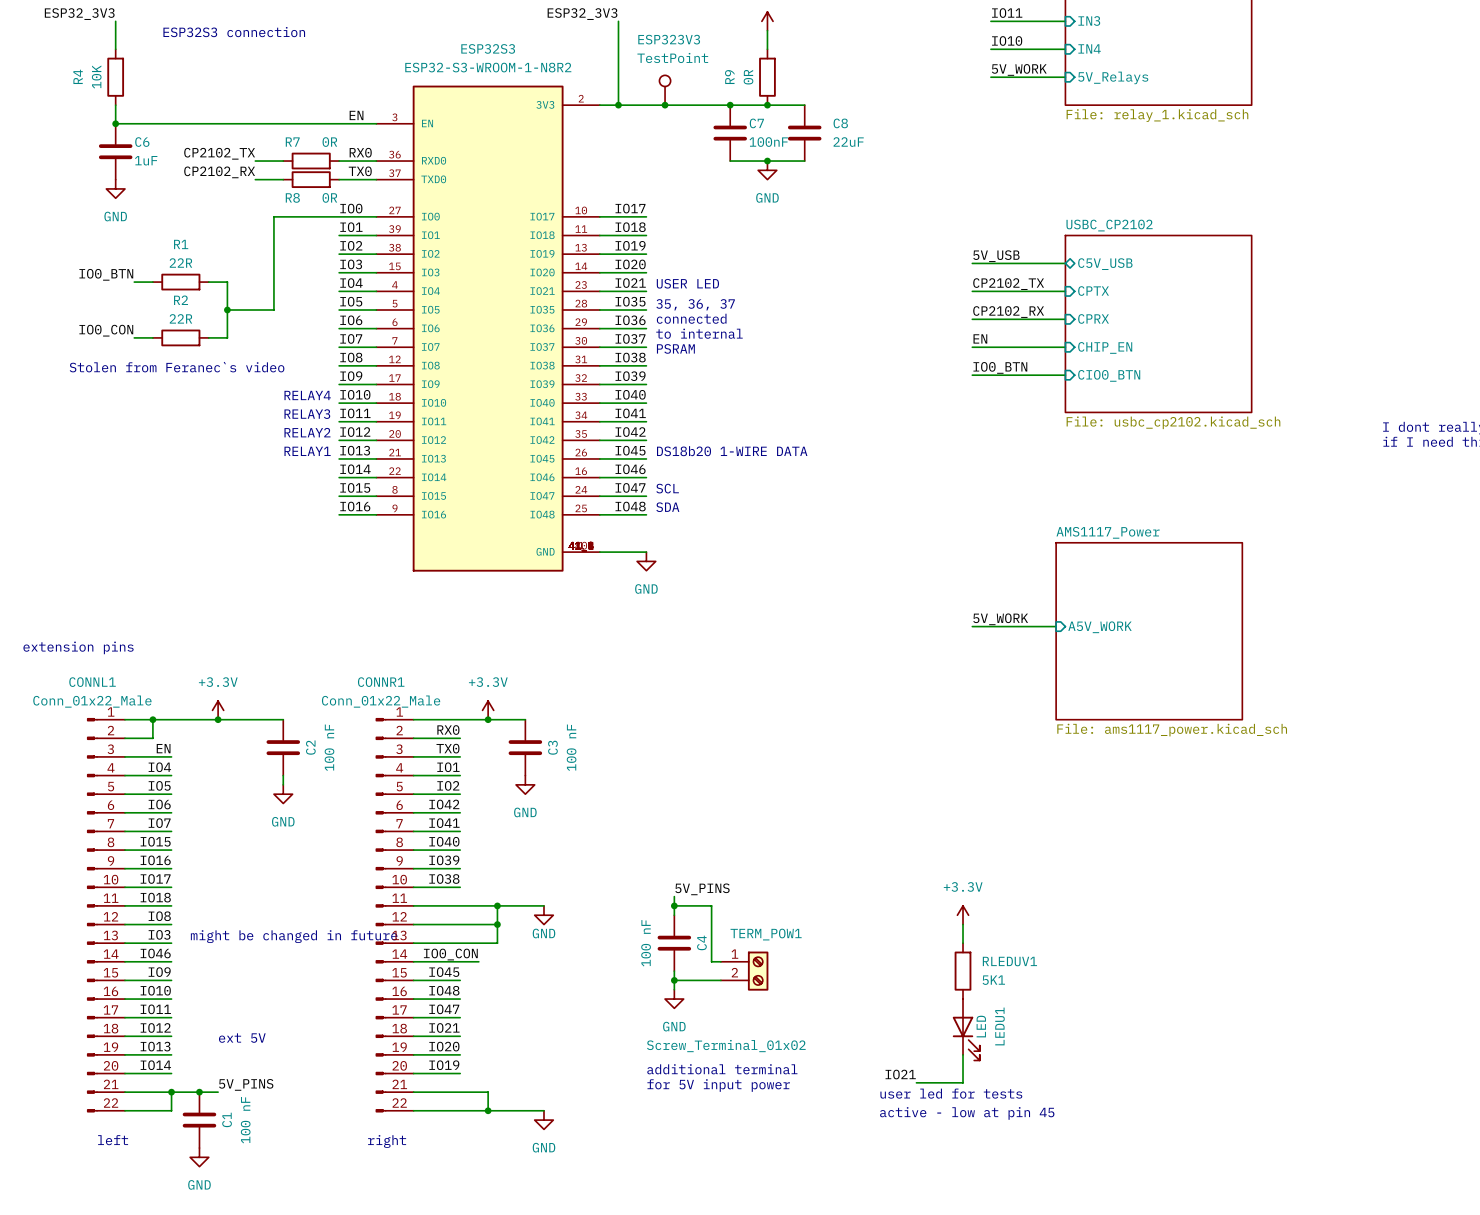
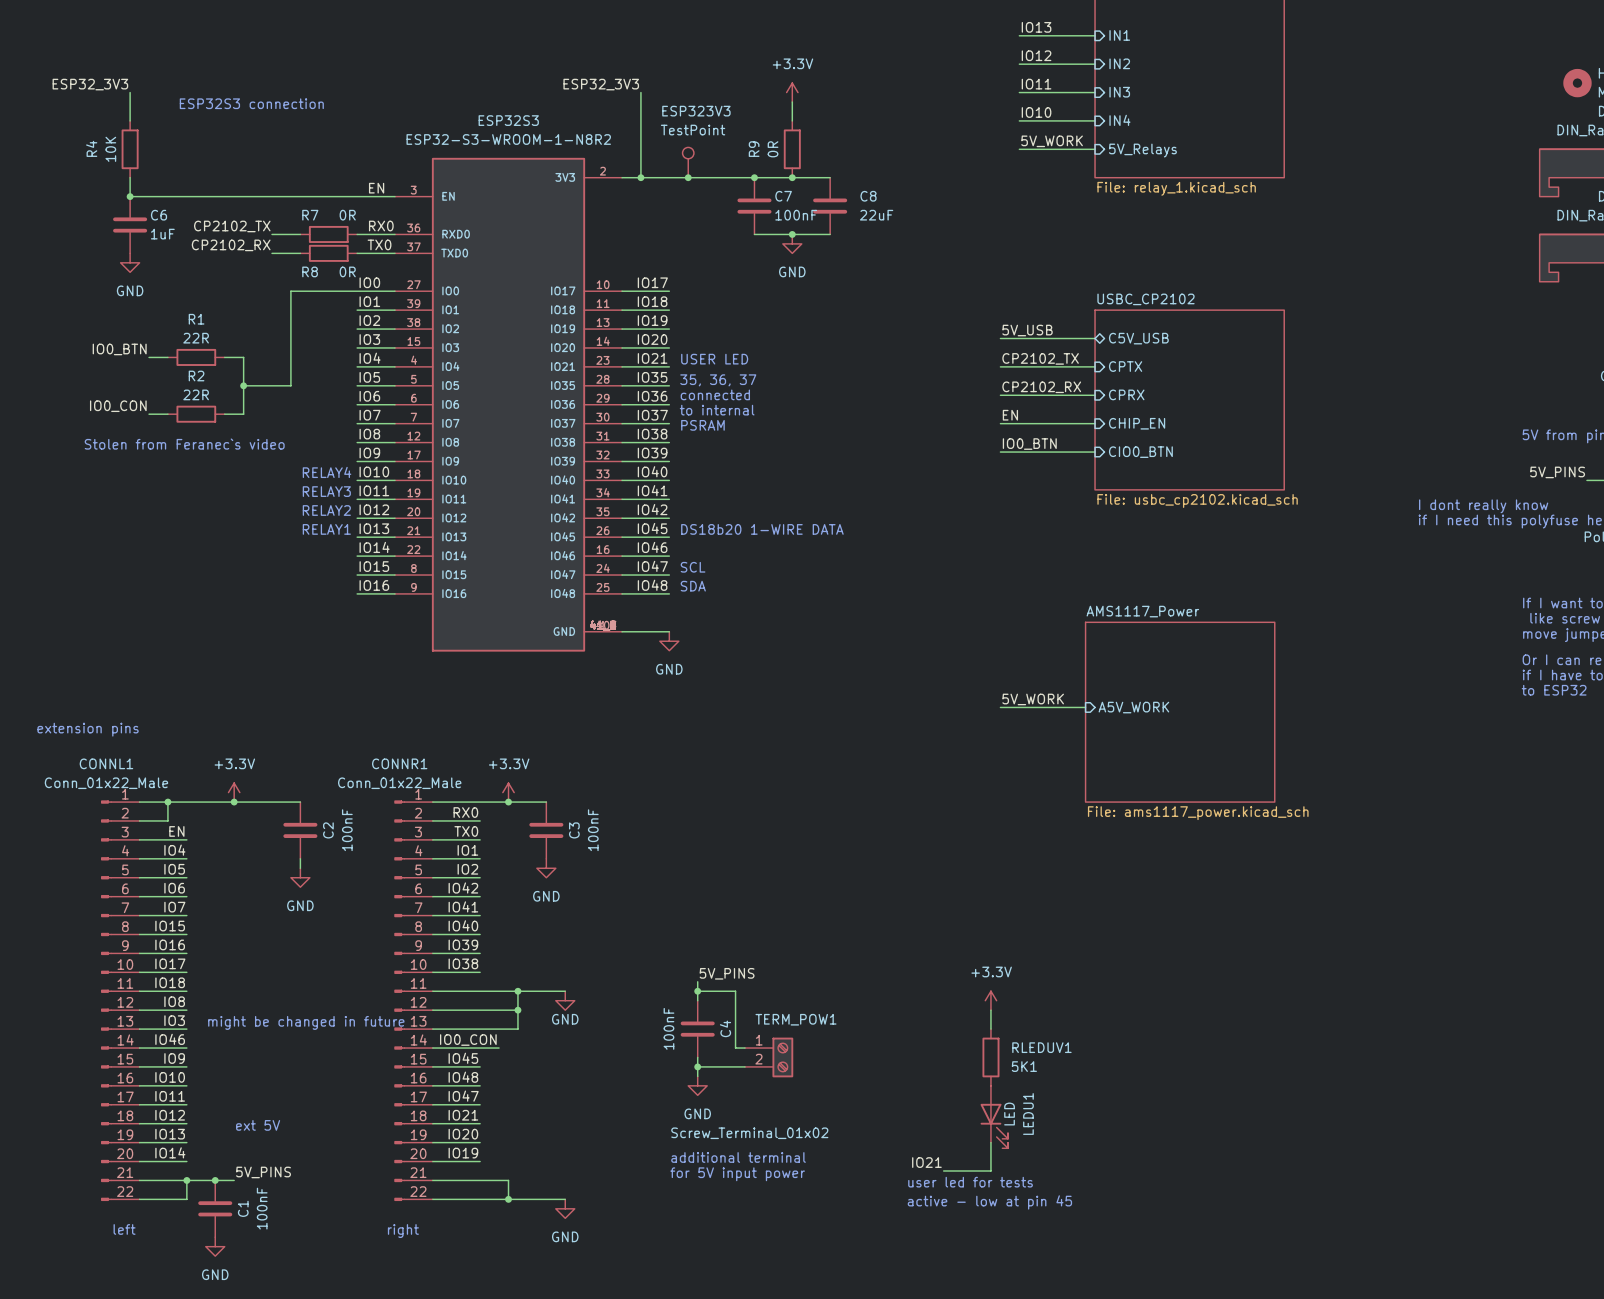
C2 value: 100 nF (329, 747) -> 100nF (347, 830)
C3 value: 100 nF (571, 747) -> 100nF (593, 830)
C4 value: 100 nF (646, 943) -> 100nF (668, 1028)
C1 value: 100 nF (245, 1120) -> 100nF (262, 1208)

